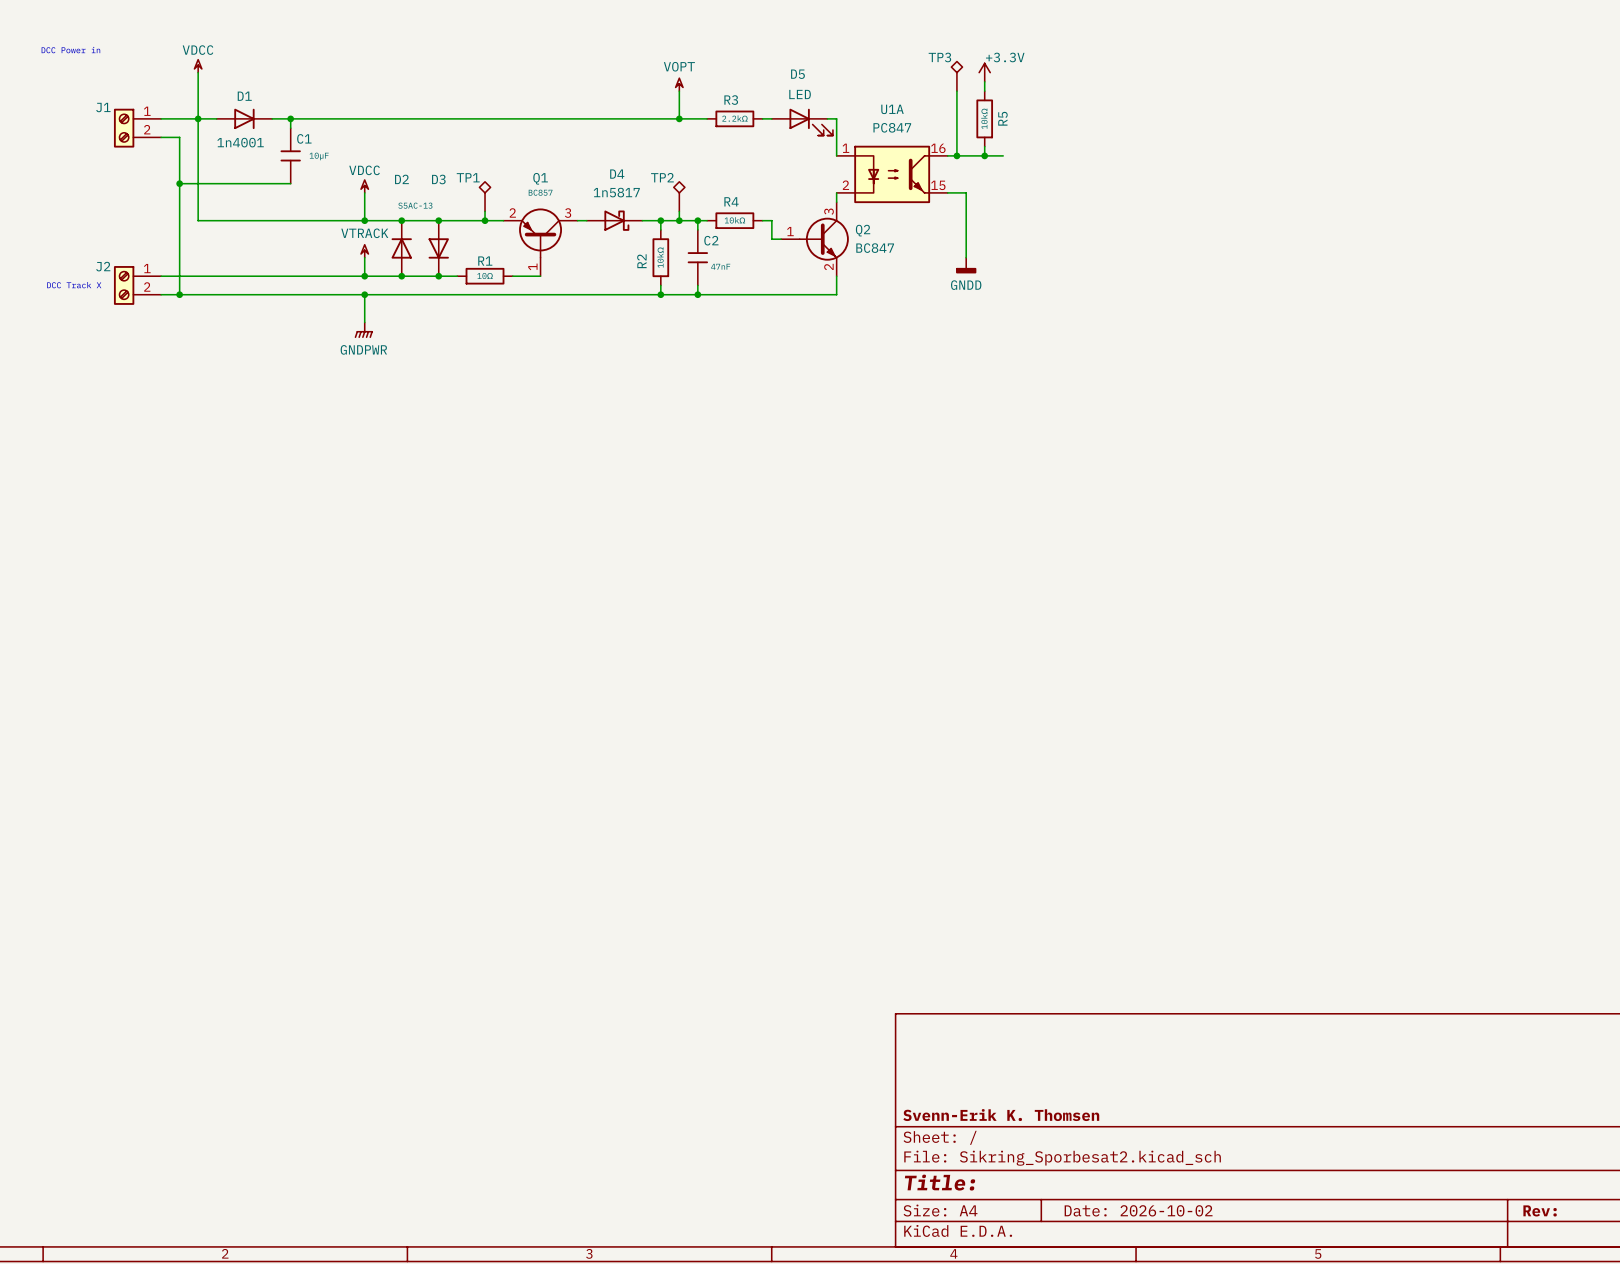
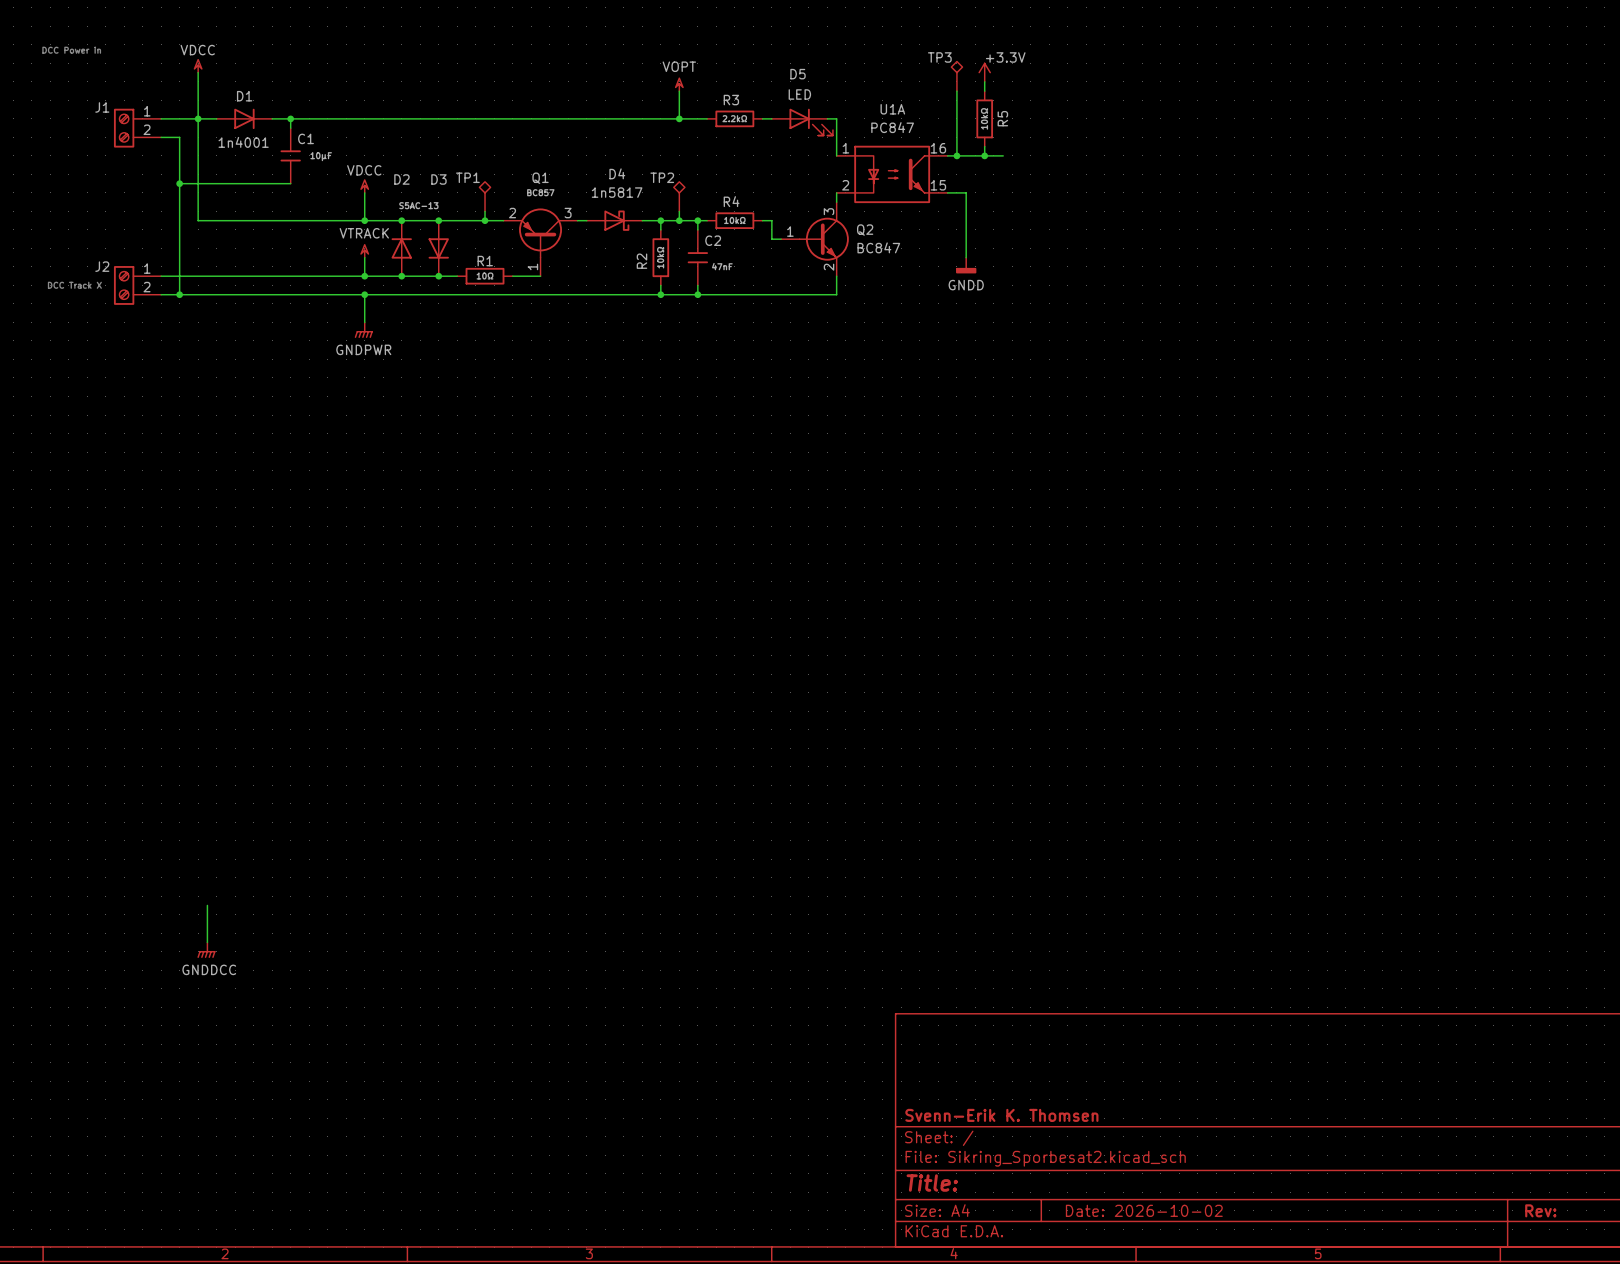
wire: none -> (207, 905) (207, 942)
power symbol: none -> GNDDCC (206, 950)

